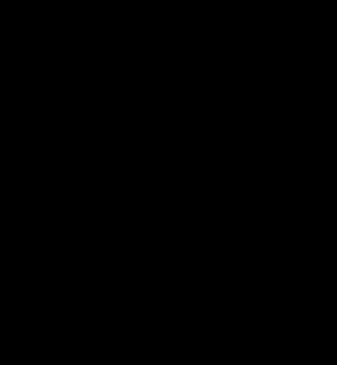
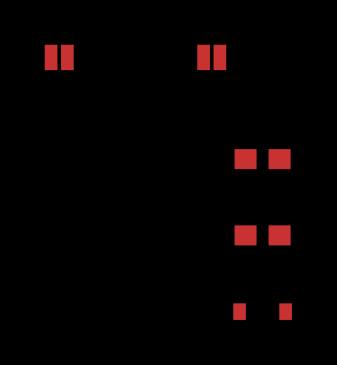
part: none -> (59, 57)
part: none -> (211, 57)
part: none -> (262, 159)
part: none -> (262, 235)
part: none -> (262, 311)

